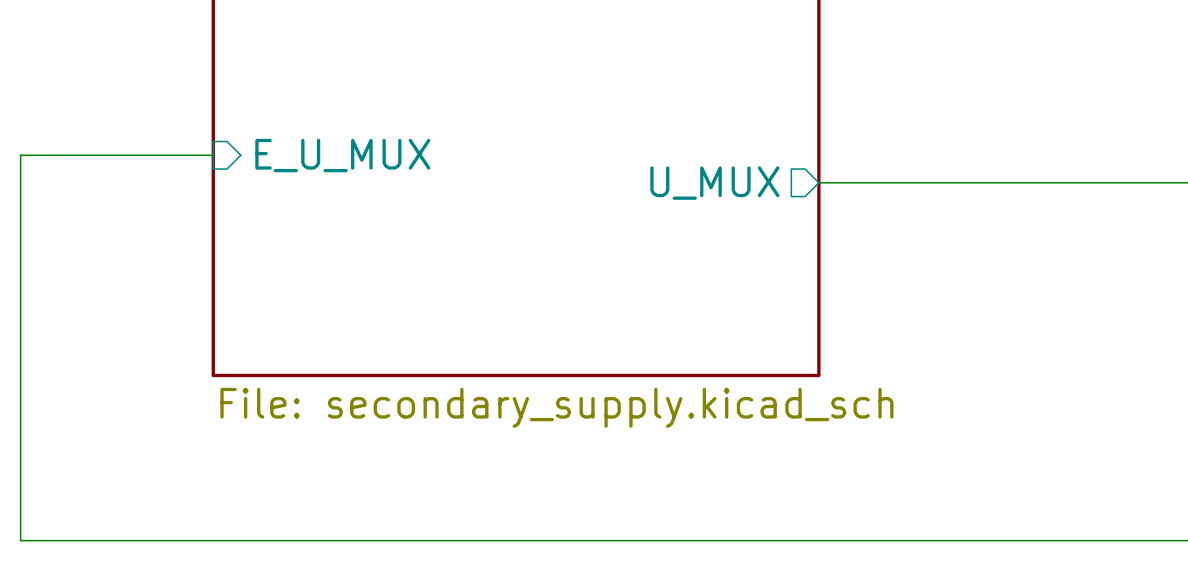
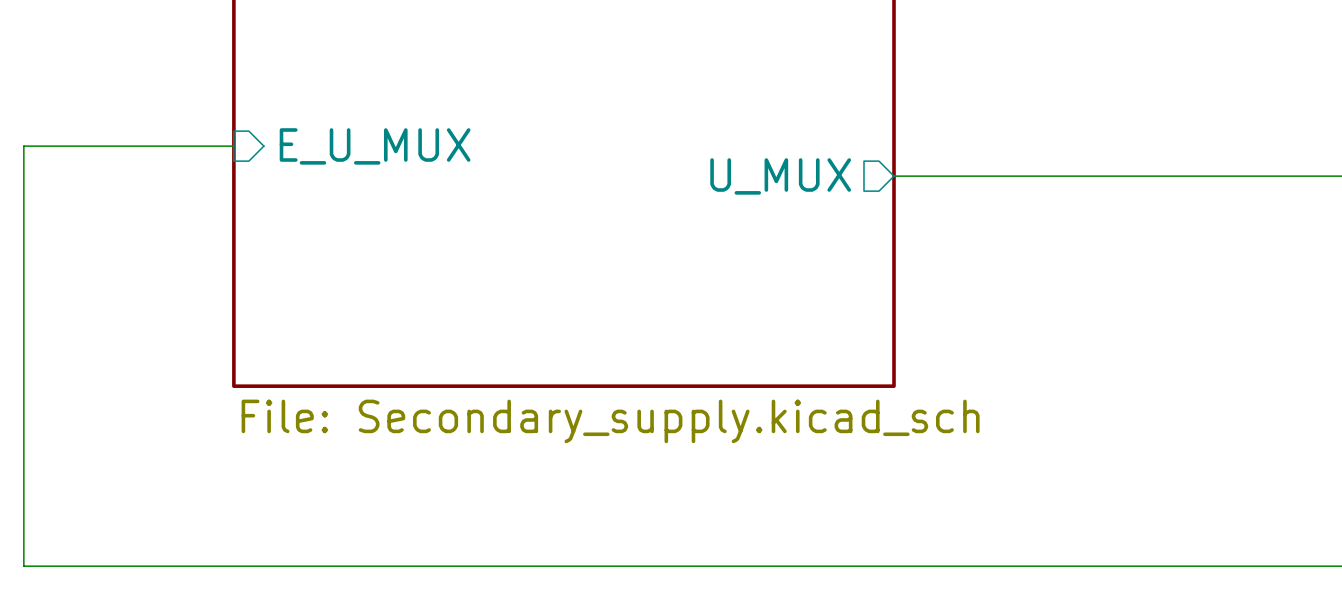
sheet value: File: secondary_supply.kicad_sch (556, 407) -> File: Secondary_supply.kicad_sch (610, 421)

